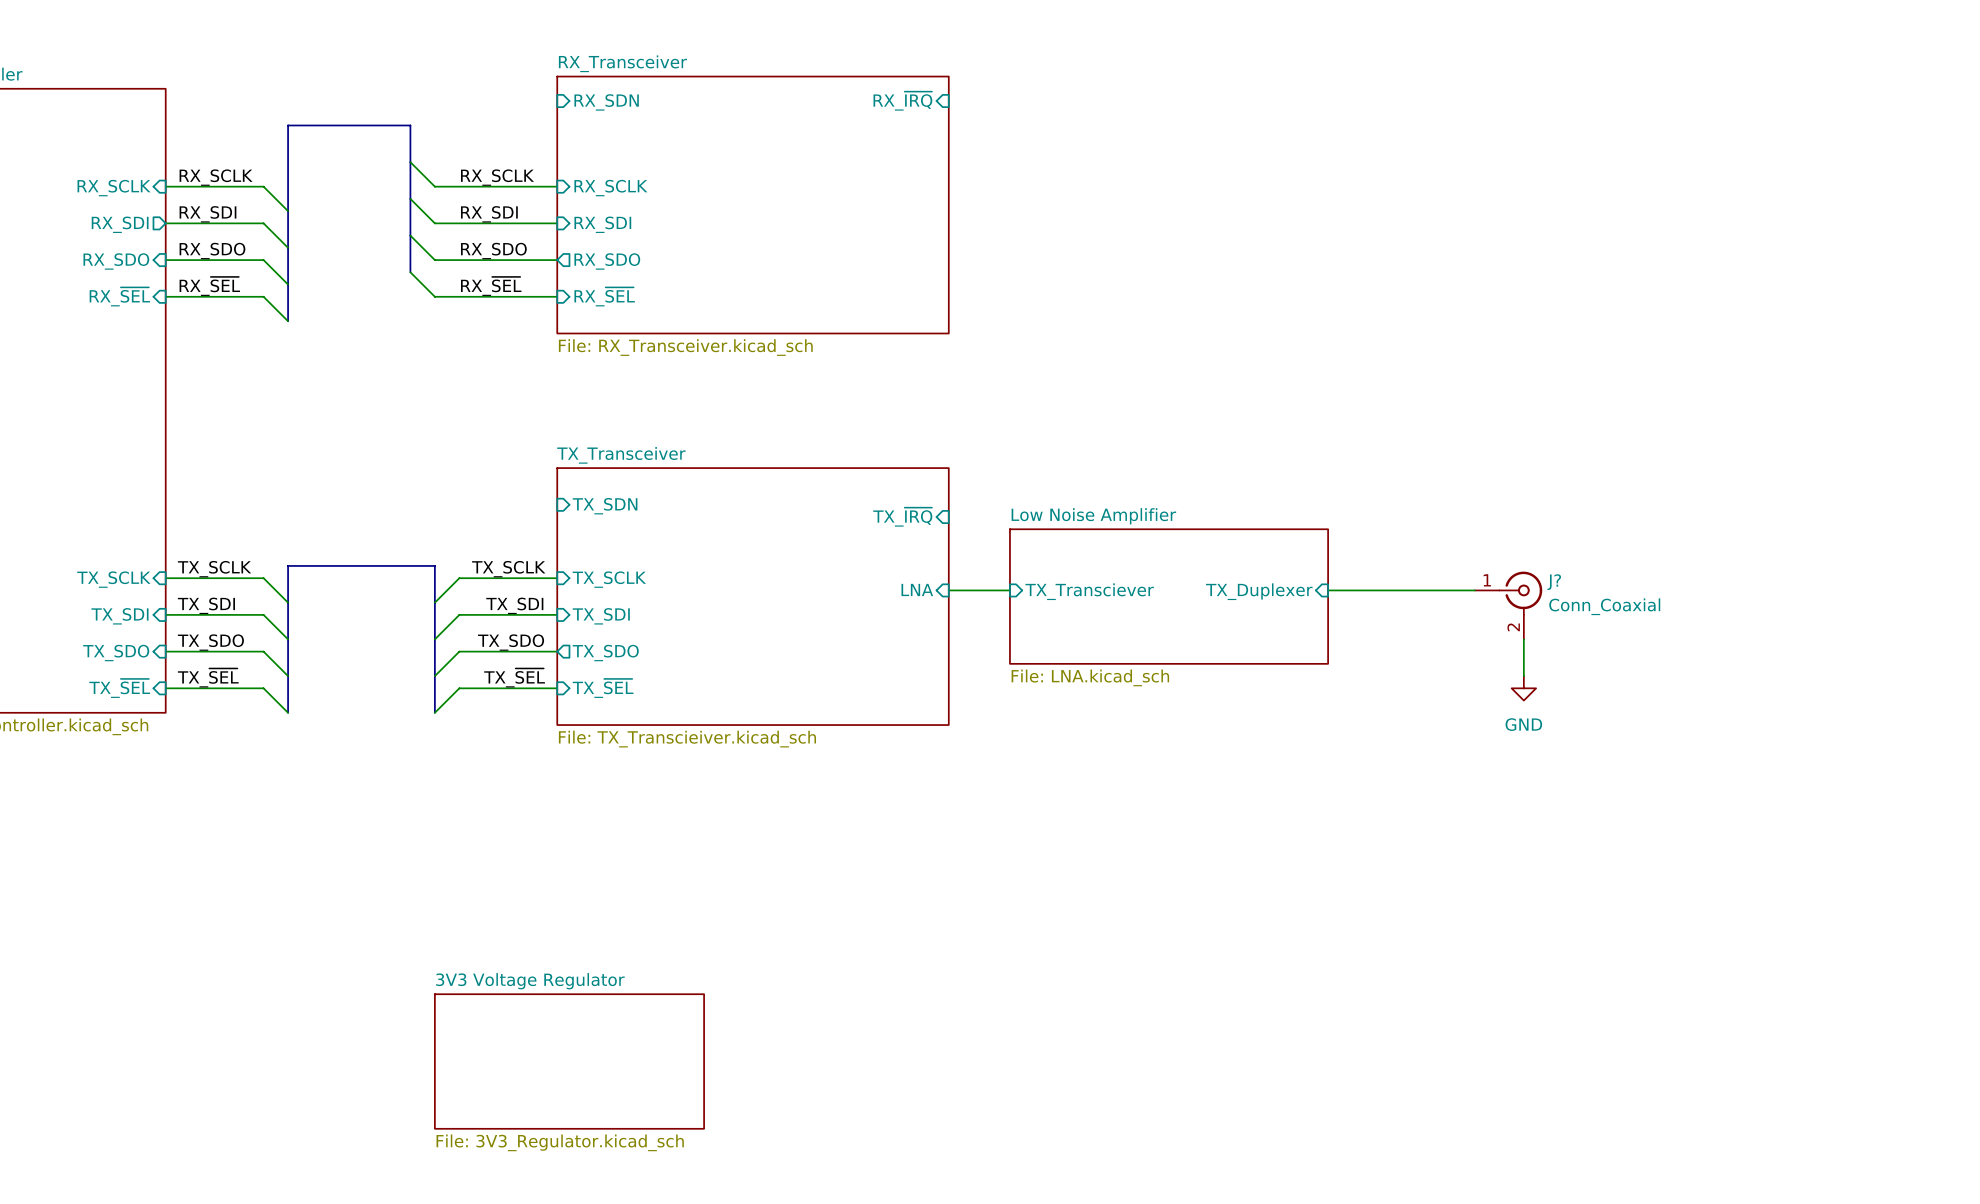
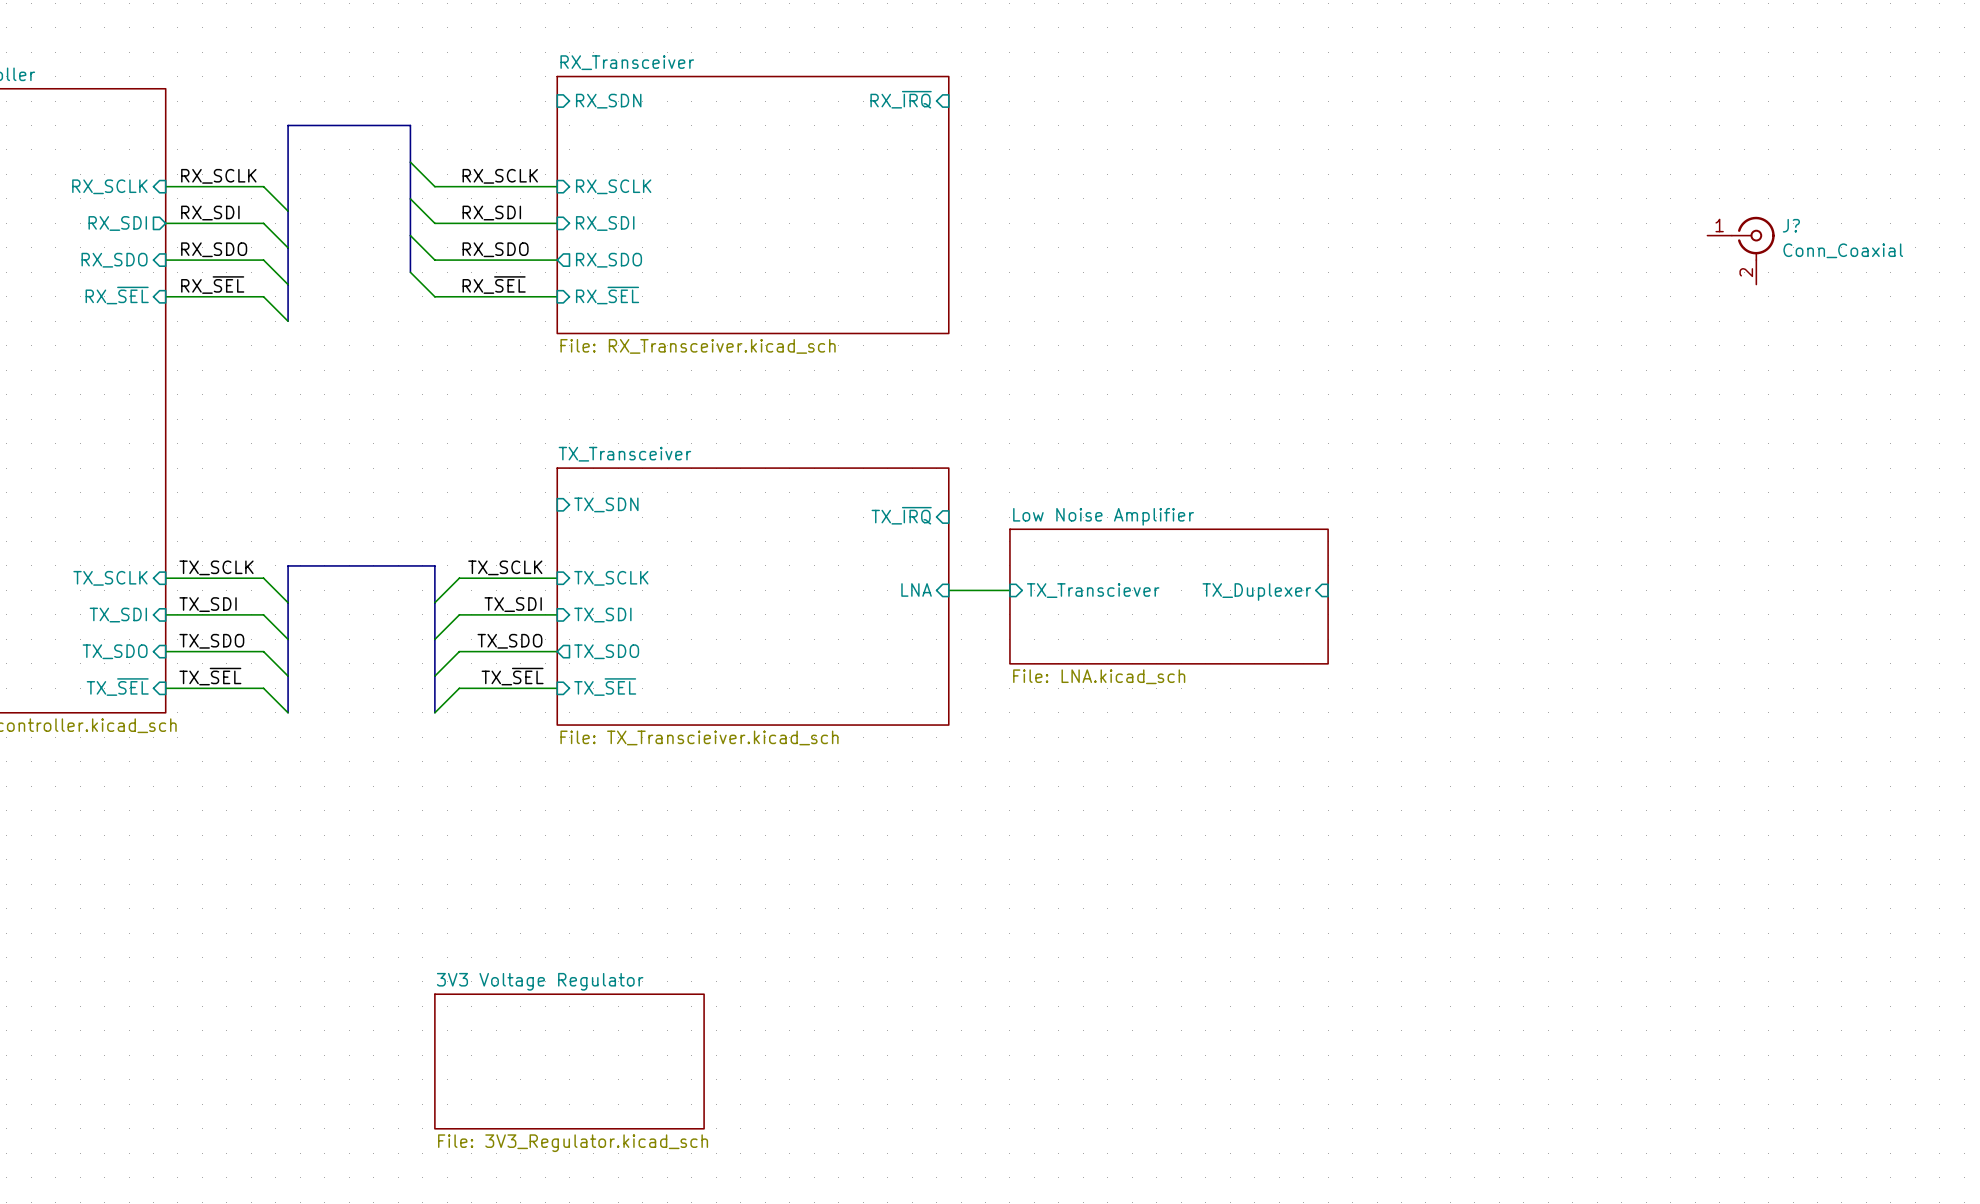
J?: none -> Conn_Coaxial (1741, 250)
wire: (1328, 590) (1474, 590) -> none
J?: Conn_Coaxial (1508, 605) -> none
wire: (1523, 639) (1523, 676) -> none
power symbol: GND (1523, 688) -> none

